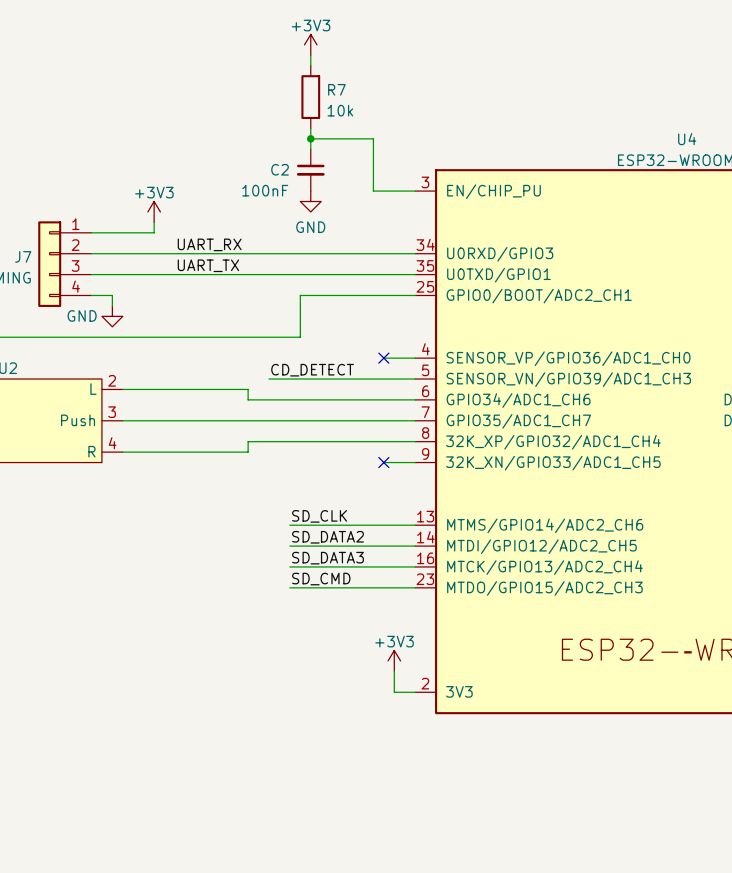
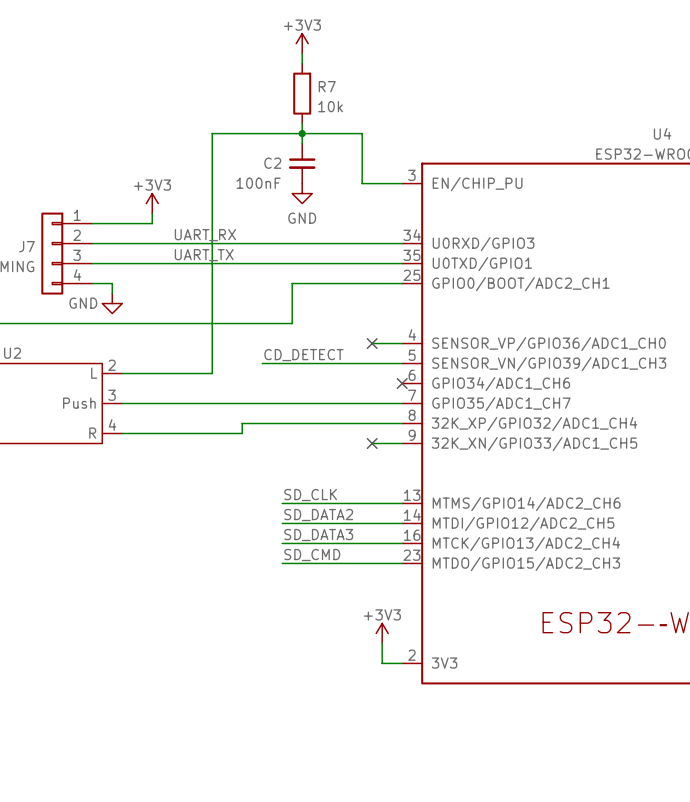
wire: (216, 389) (248, 389) (248, 399) (415, 399) -> (212, 373) (212, 133) (302, 133)
no-connect mark: none -> (402, 383)

